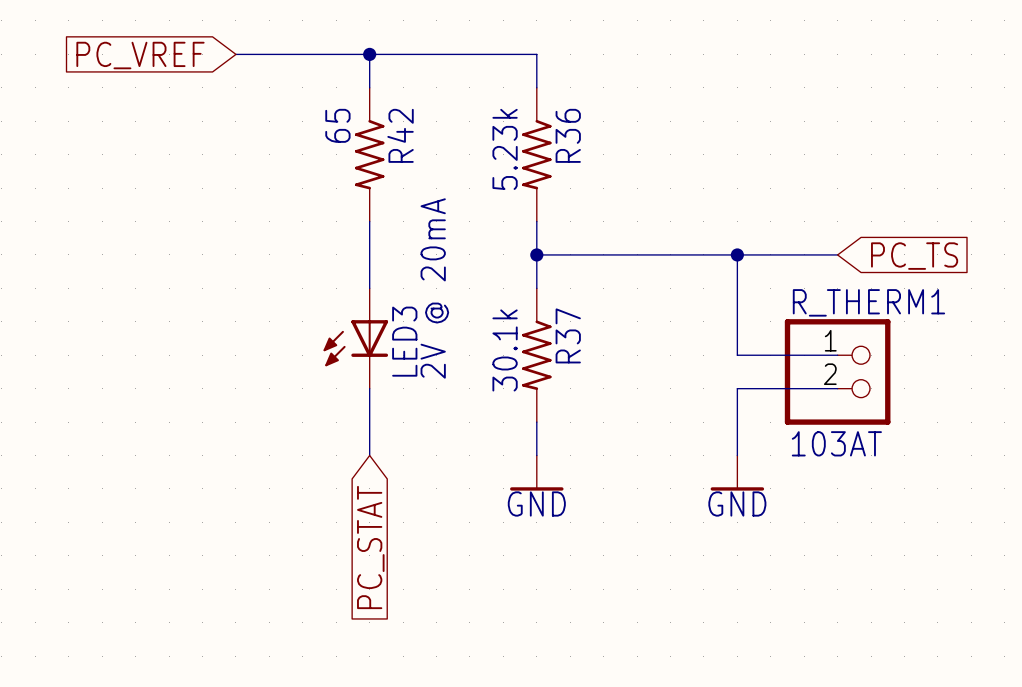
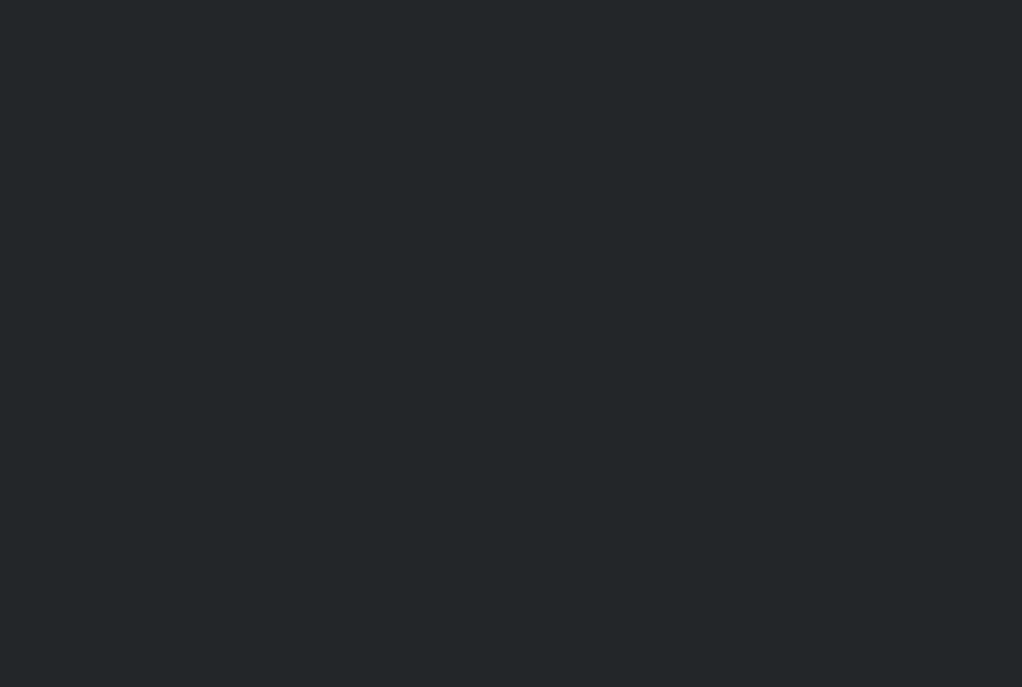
wire: (235, 54) (536, 54) (536, 87) -> none
wire: (369, 54) (369, 87) -> none
junction: (369, 54) -> none
global label: PC_VREF (140, 55) -> none
R42: 65 (369, 154) -> none
R36: 5.23k (536, 154) -> none
wire: (369, 221) (369, 288) -> none
wire: (536, 221) (536, 288) -> none
wire: (536, 254) (837, 254) -> none
junction: (536, 254) -> none
wire: (737, 254) (737, 355) (837, 355) -> none
junction: (737, 254) -> none
global label: PC_TS (914, 256) -> none
LED3: 2V @ 20mA (355, 338) -> none
R37: 30.1k (536, 355) -> none
R_THERM1: 103AT (837, 371) -> none
wire: (369, 388) (369, 455) -> none
wire: (837, 388) (737, 388) (737, 455) -> none
wire: (536, 422) (536, 455) -> none
power symbol: GND (536, 473) -> none
power symbol: GND (737, 473) -> none
global label: PC_STAT (370, 547) -> none

